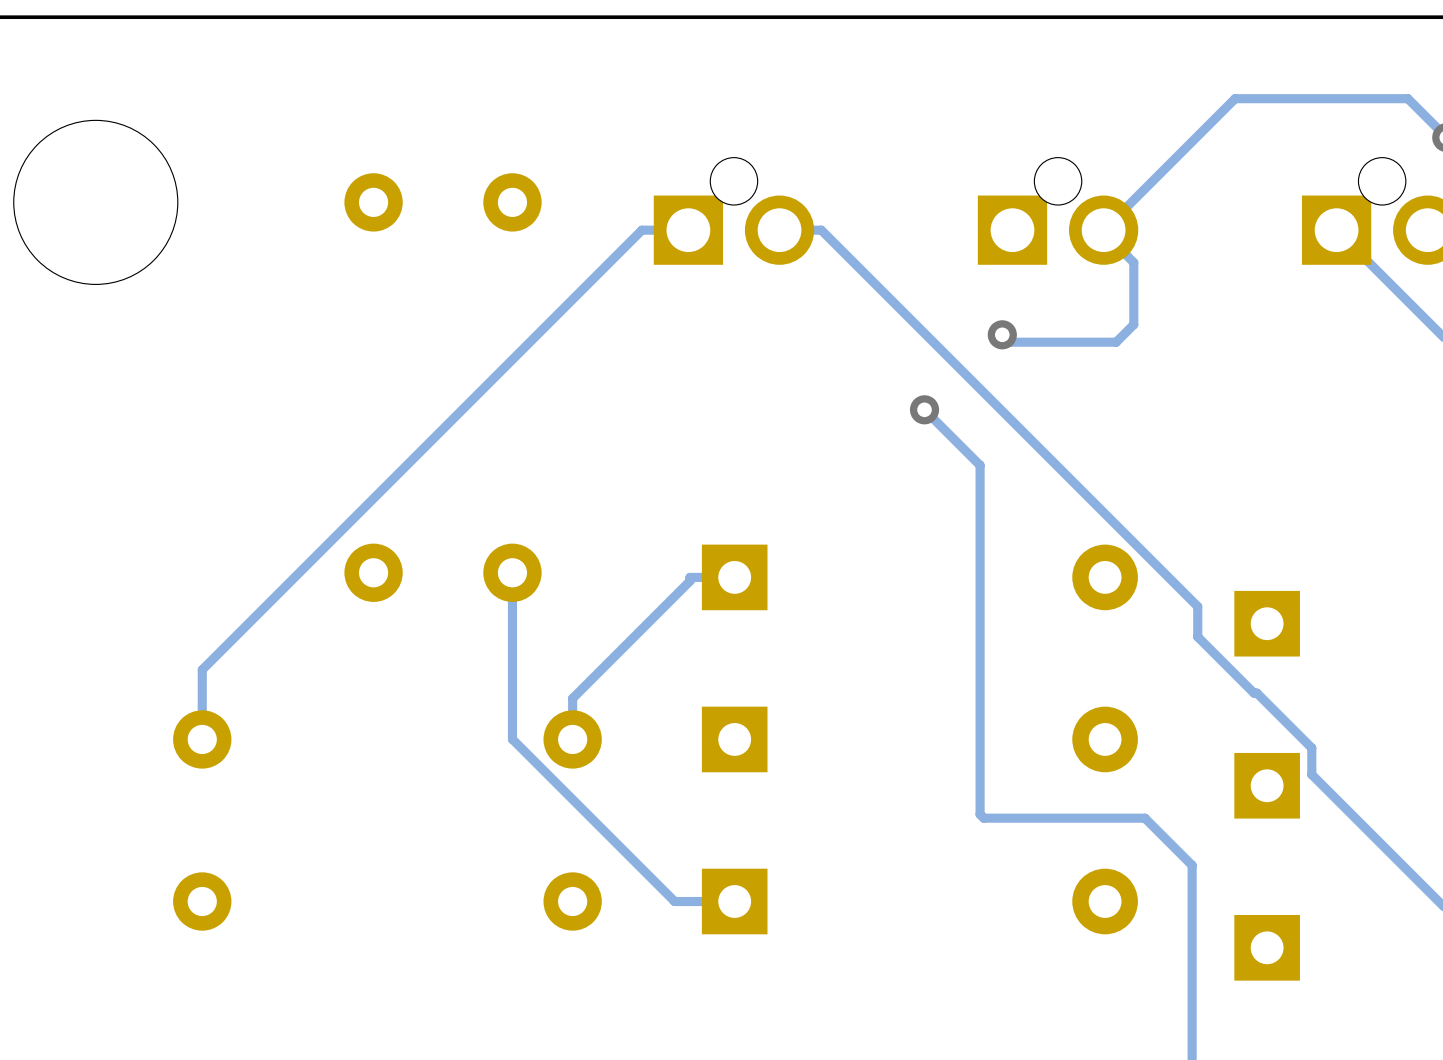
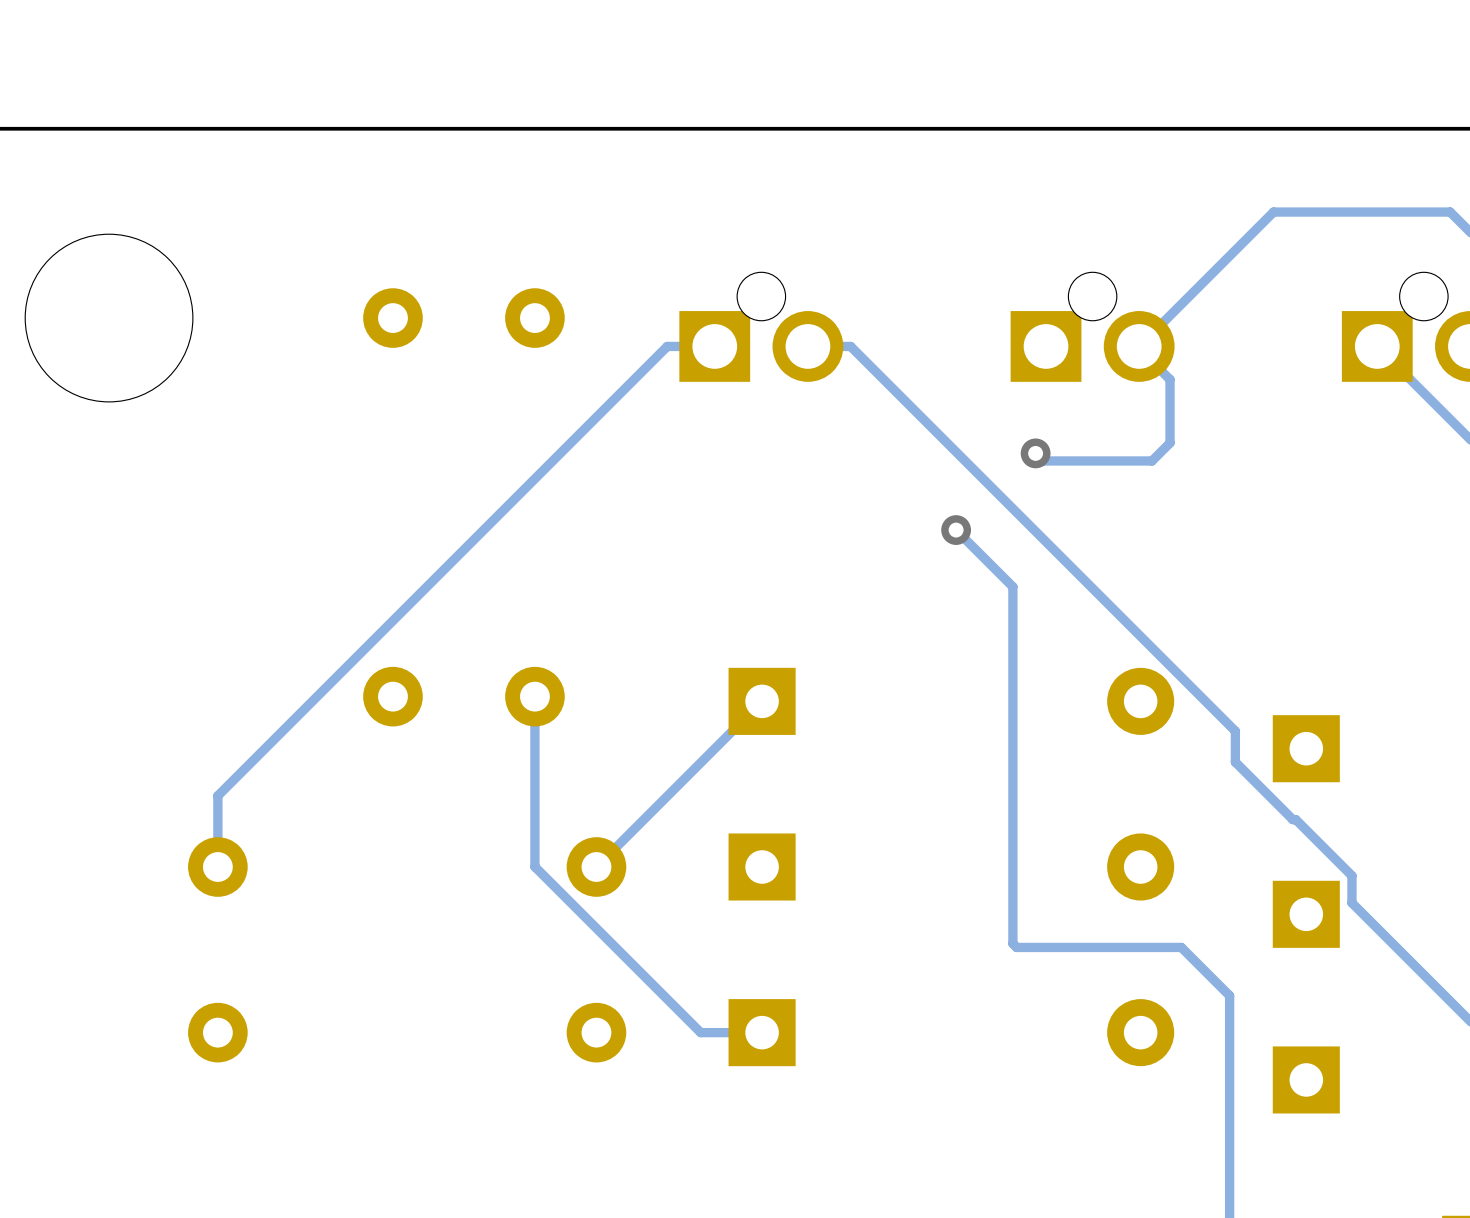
track: (734, 577) (690, 577) (690, 581) (572, 698) (572, 739) -> (762, 701) (596, 867)

